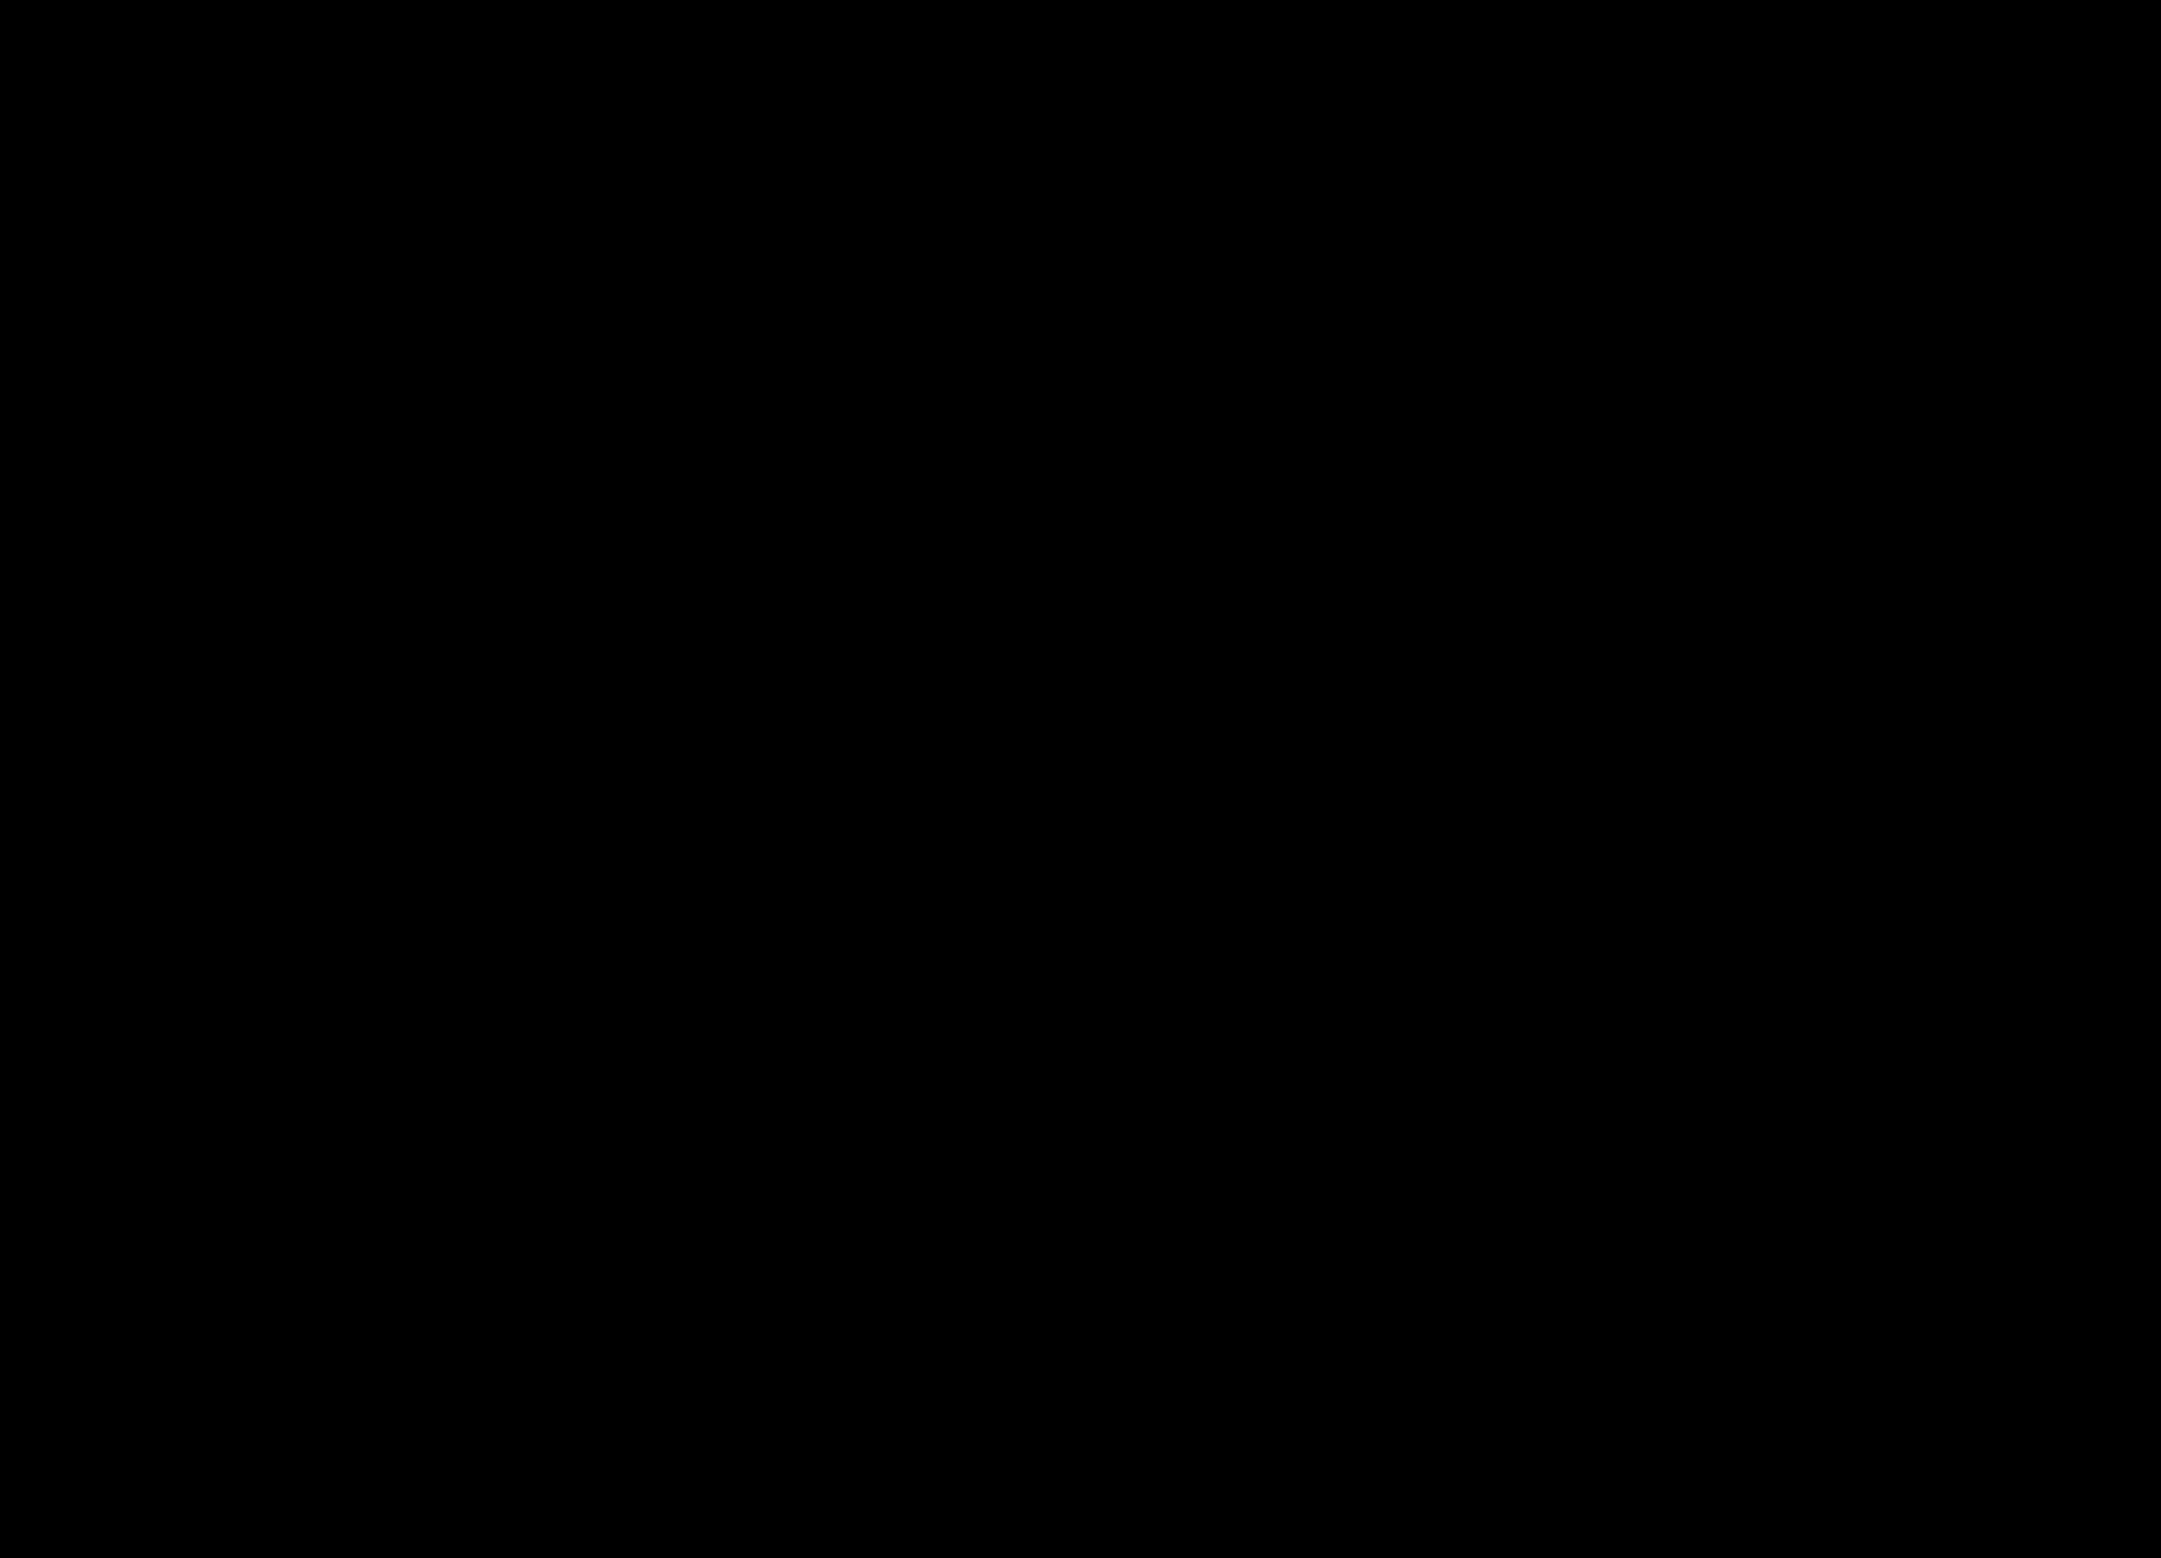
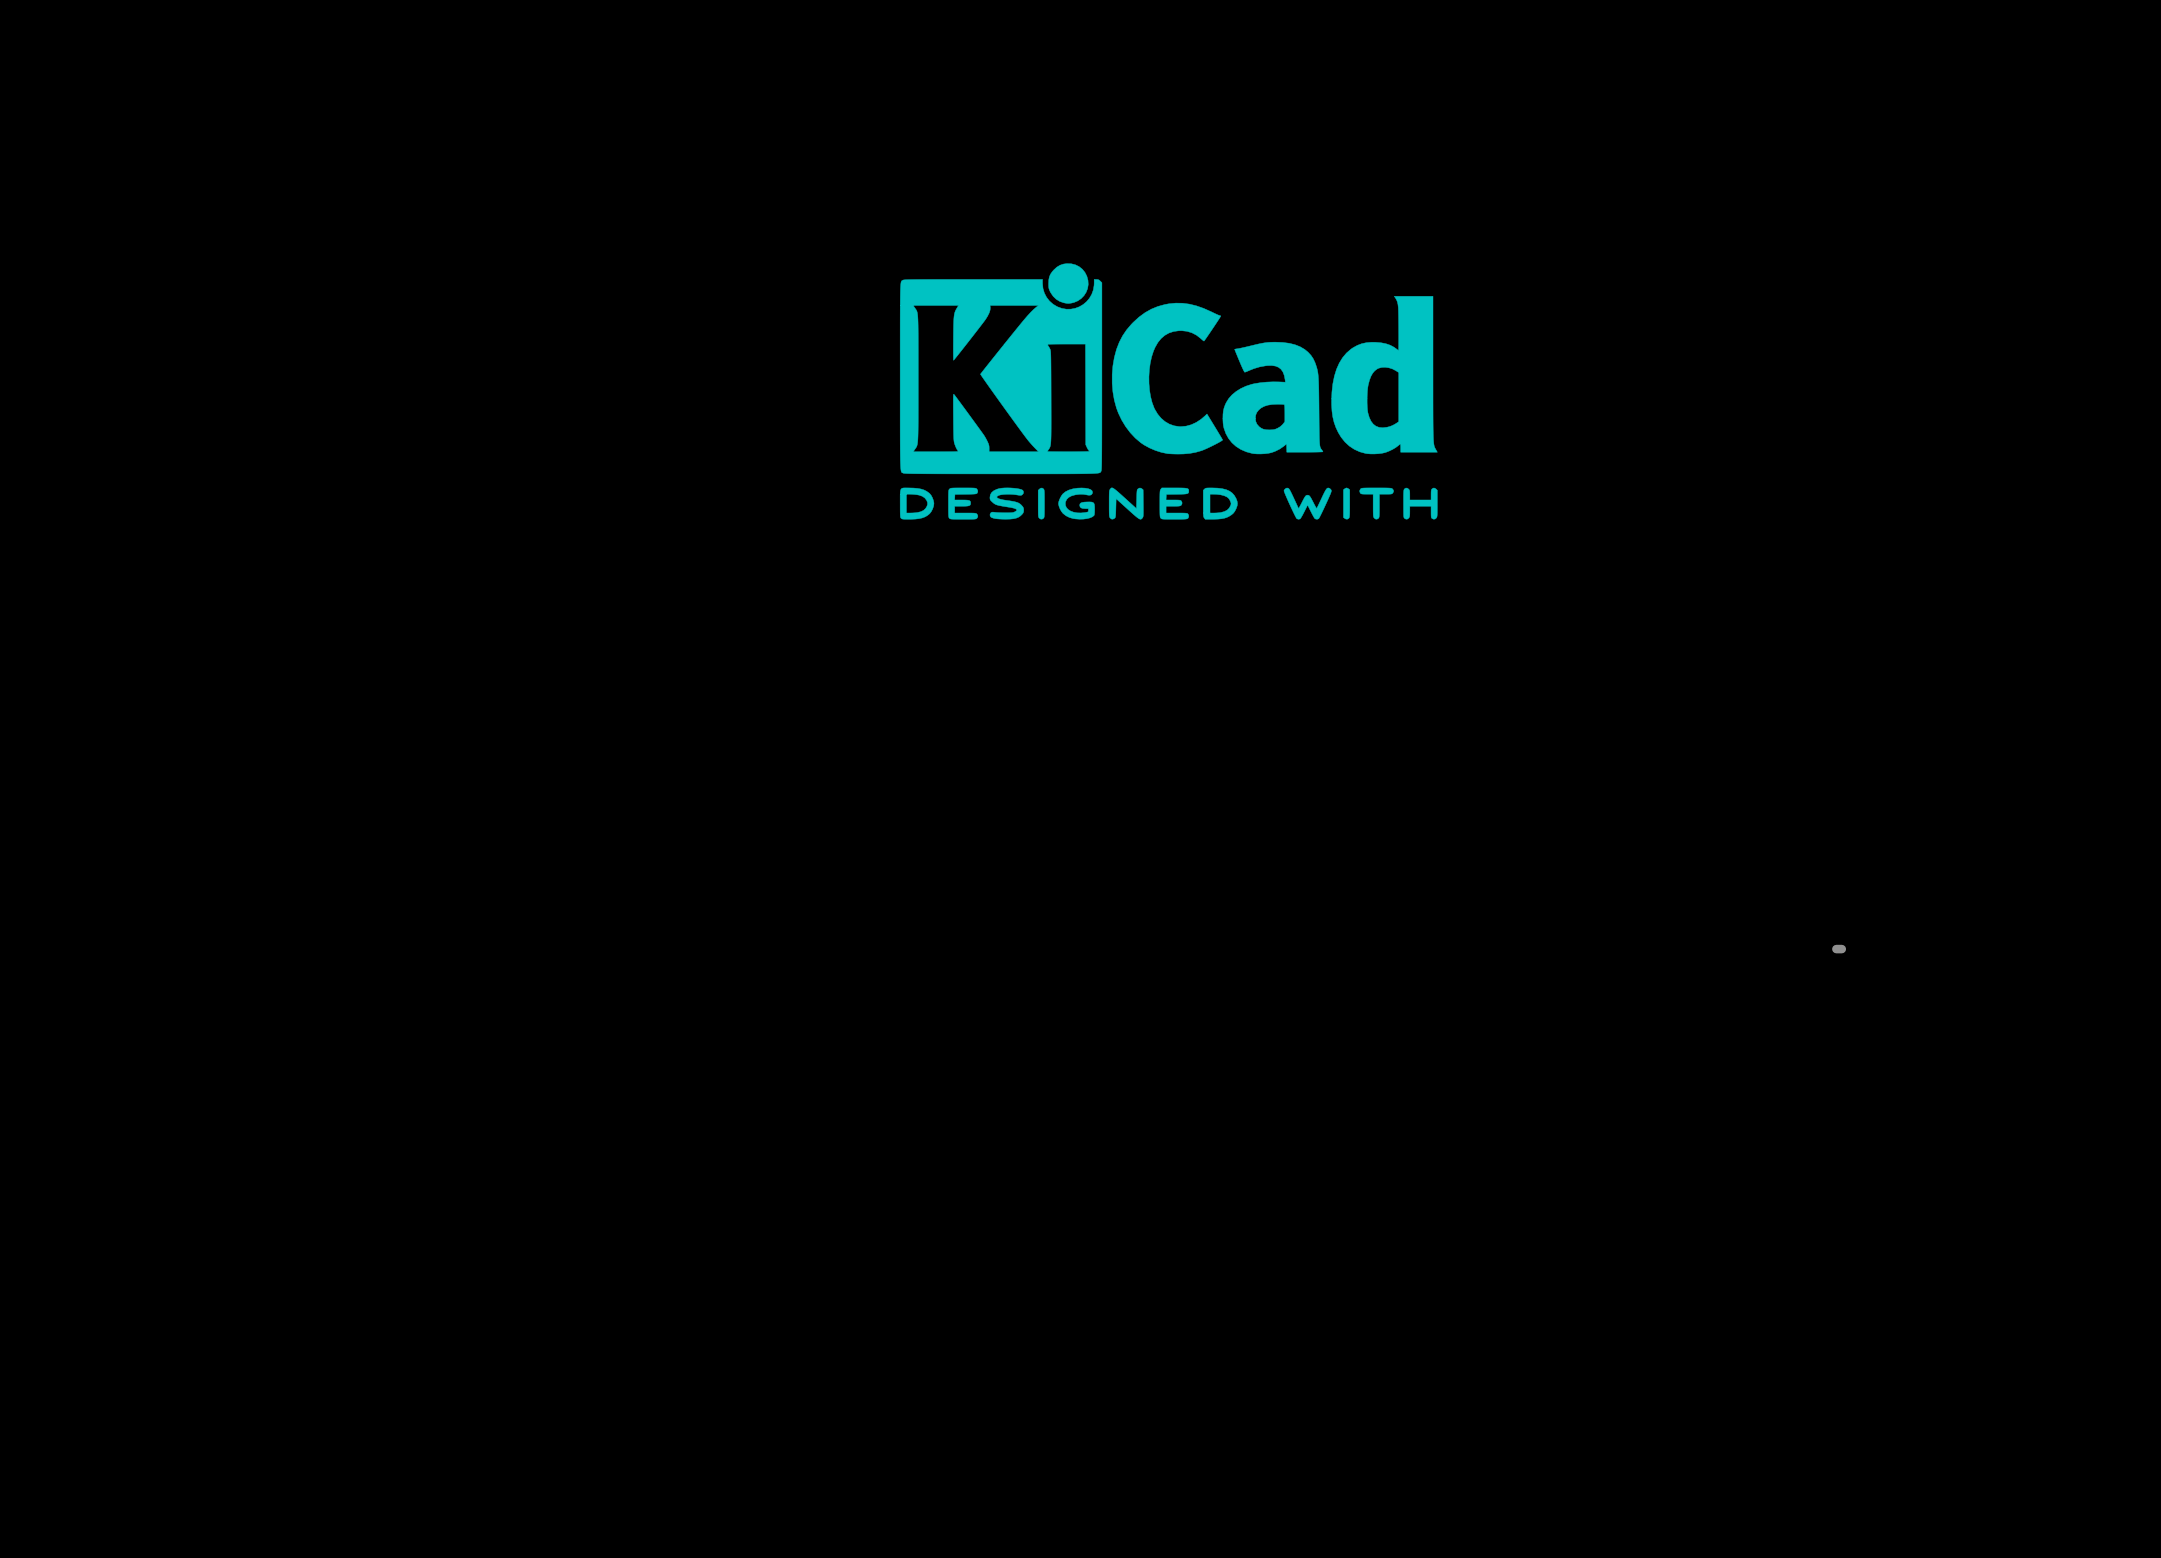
drawing: none -> [899, 263, 1438, 520]
line: none -> (1836, 949) (1841, 949)

